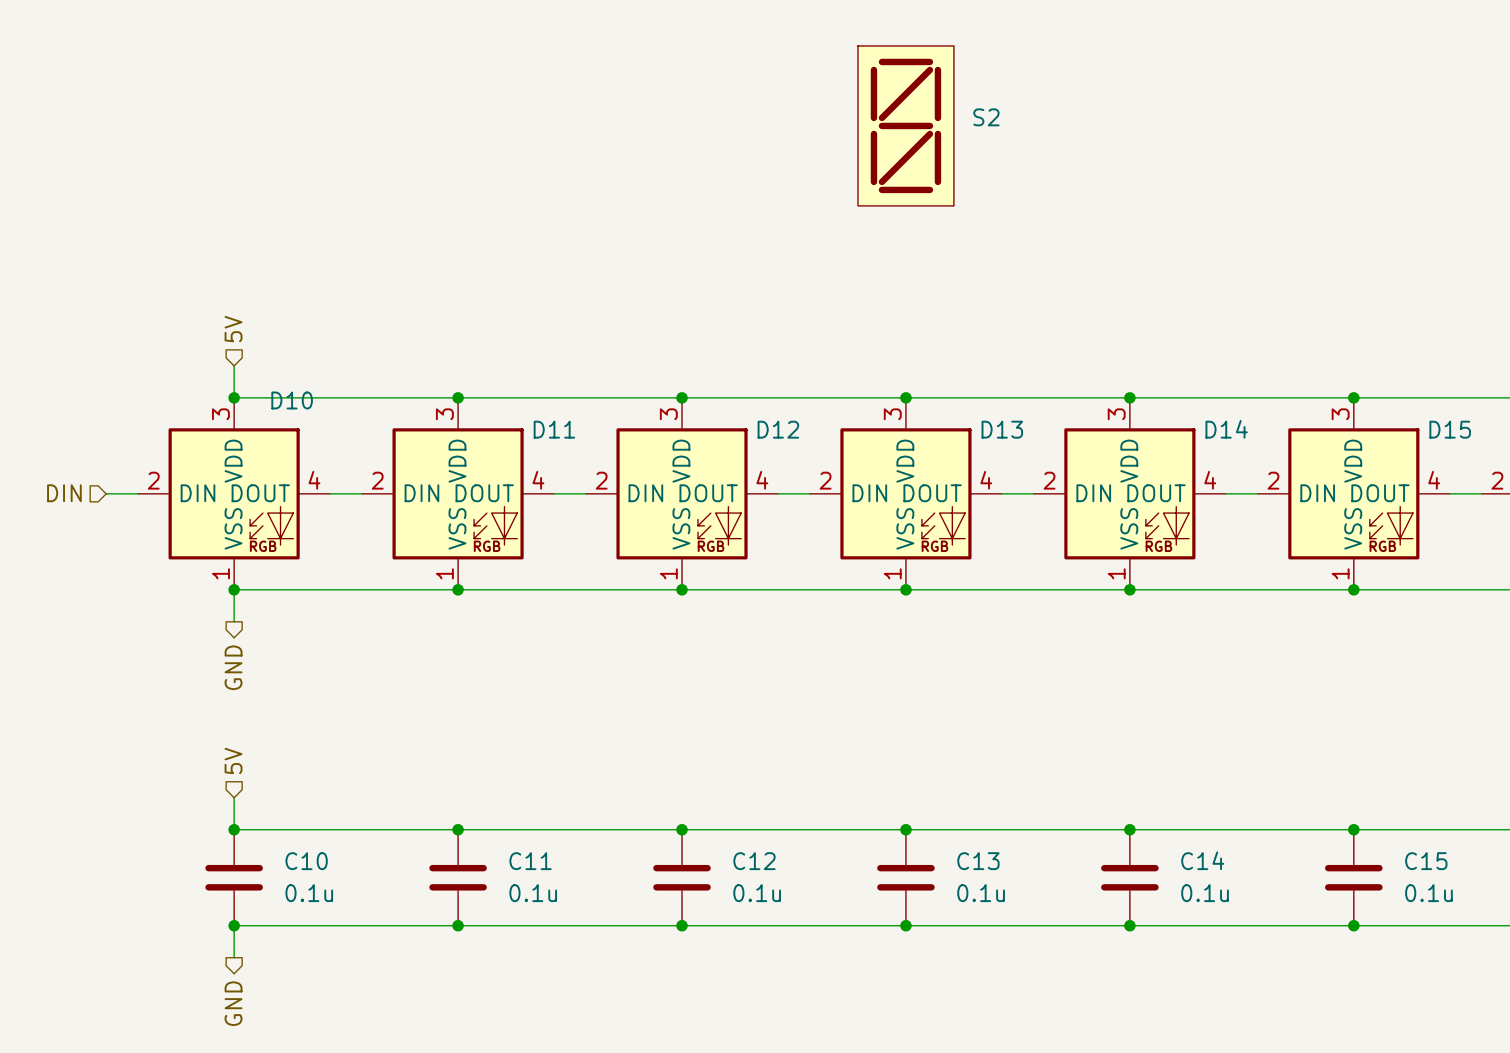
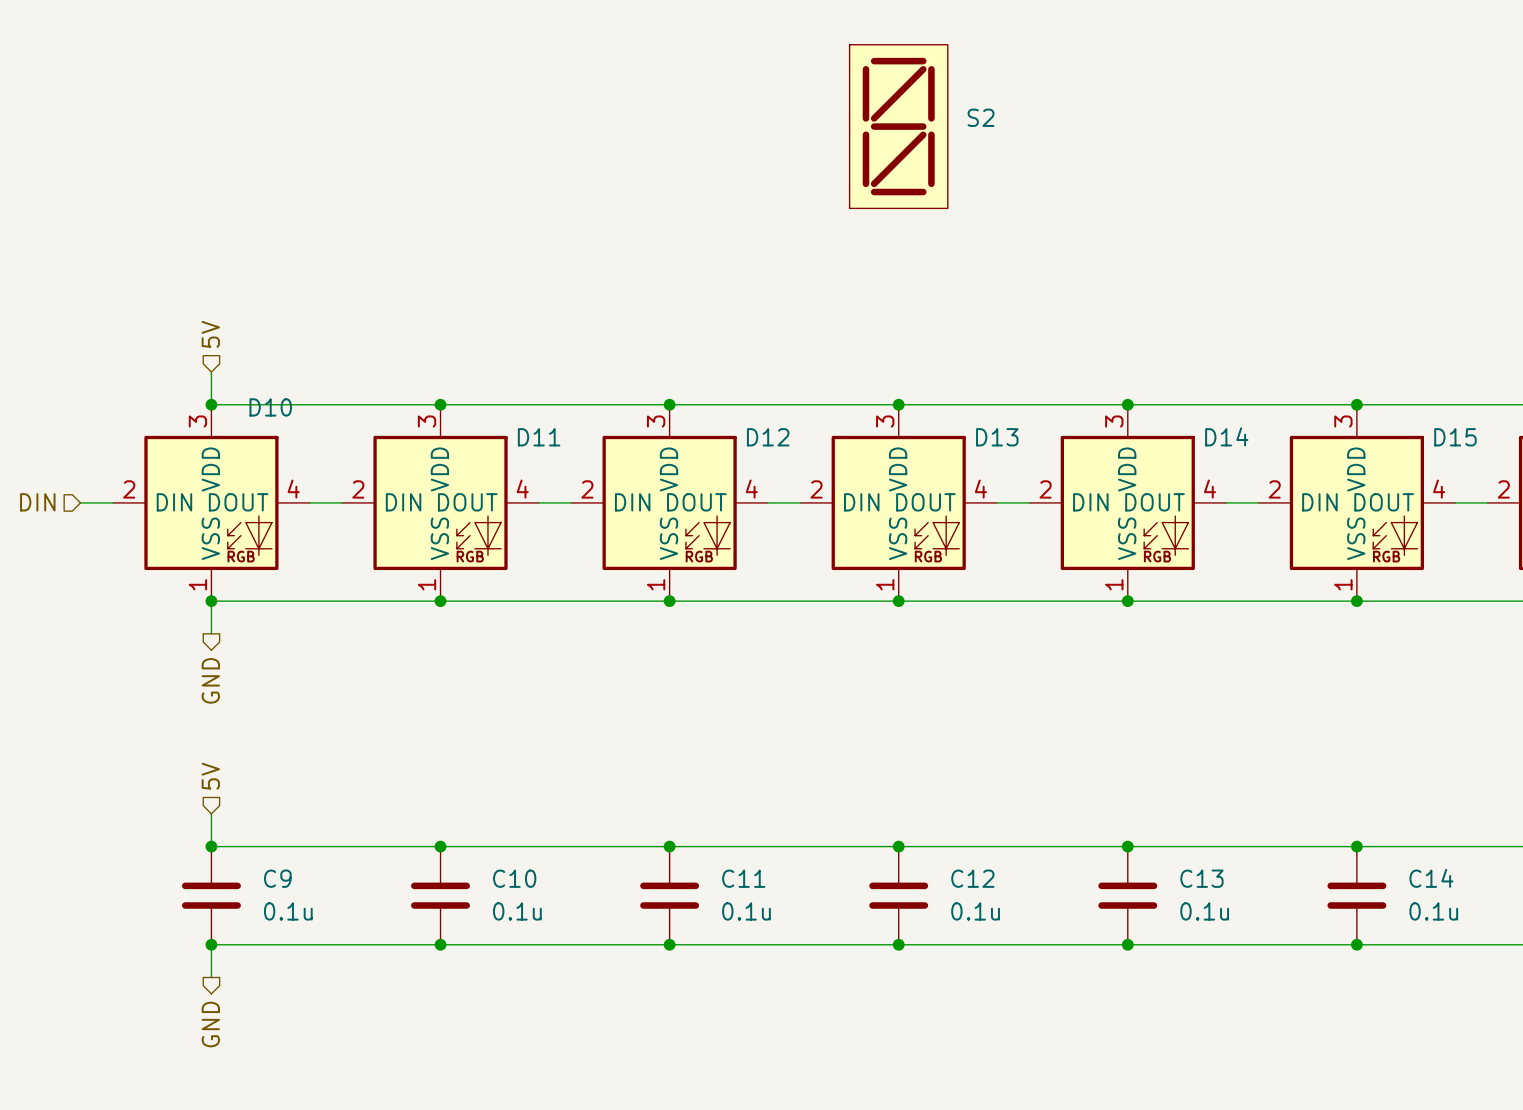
C14 name: C14 (1202, 860) -> C13 (1201, 878)
C10 name: C10 (306, 861) -> C9 (277, 878)
C11 name: C11 (530, 861) -> C10 (514, 878)
C12 name: C12 (754, 861) -> C11 (743, 878)
C13 name: C13 (978, 861) -> C12 (972, 878)
C15 name: C15 (1426, 861) -> C14 (1431, 878)

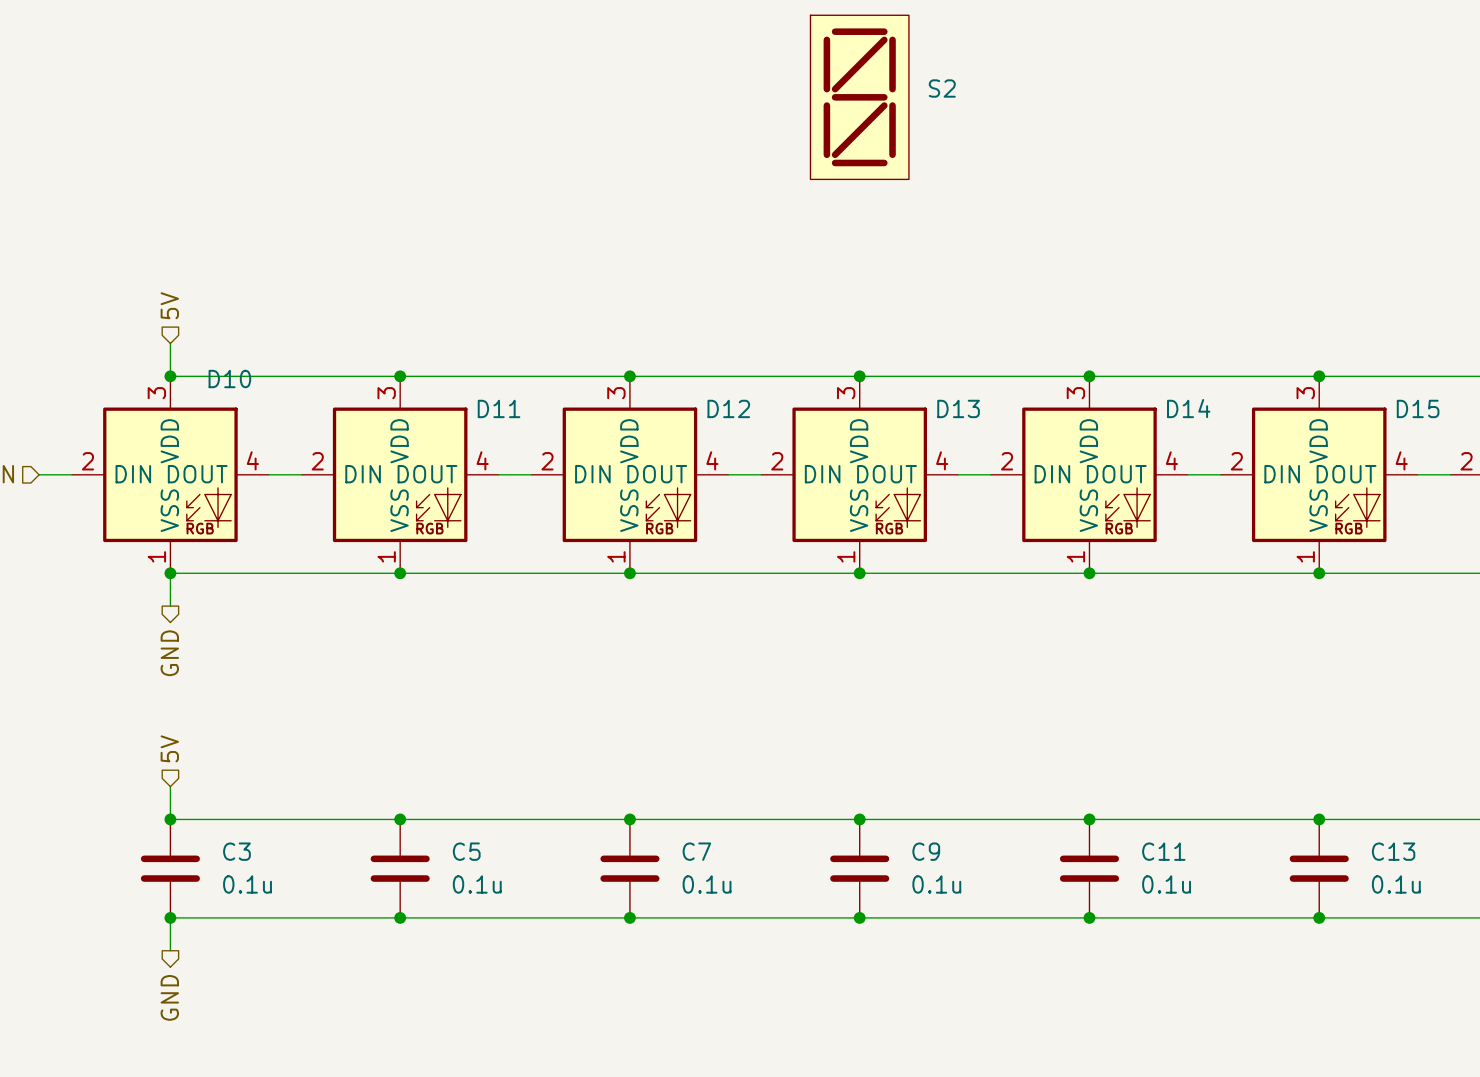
C9 name: C9 (277, 878) -> C3 (236, 851)
C10 name: C10 (514, 878) -> C5 (466, 851)
C11 name: C11 (743, 878) -> C7 (696, 851)
C12 name: C12 (972, 878) -> C9 (926, 851)
C13 name: C13 (1201, 878) -> C11 (1163, 851)
C14 name: C14 (1431, 878) -> C13 (1393, 851)

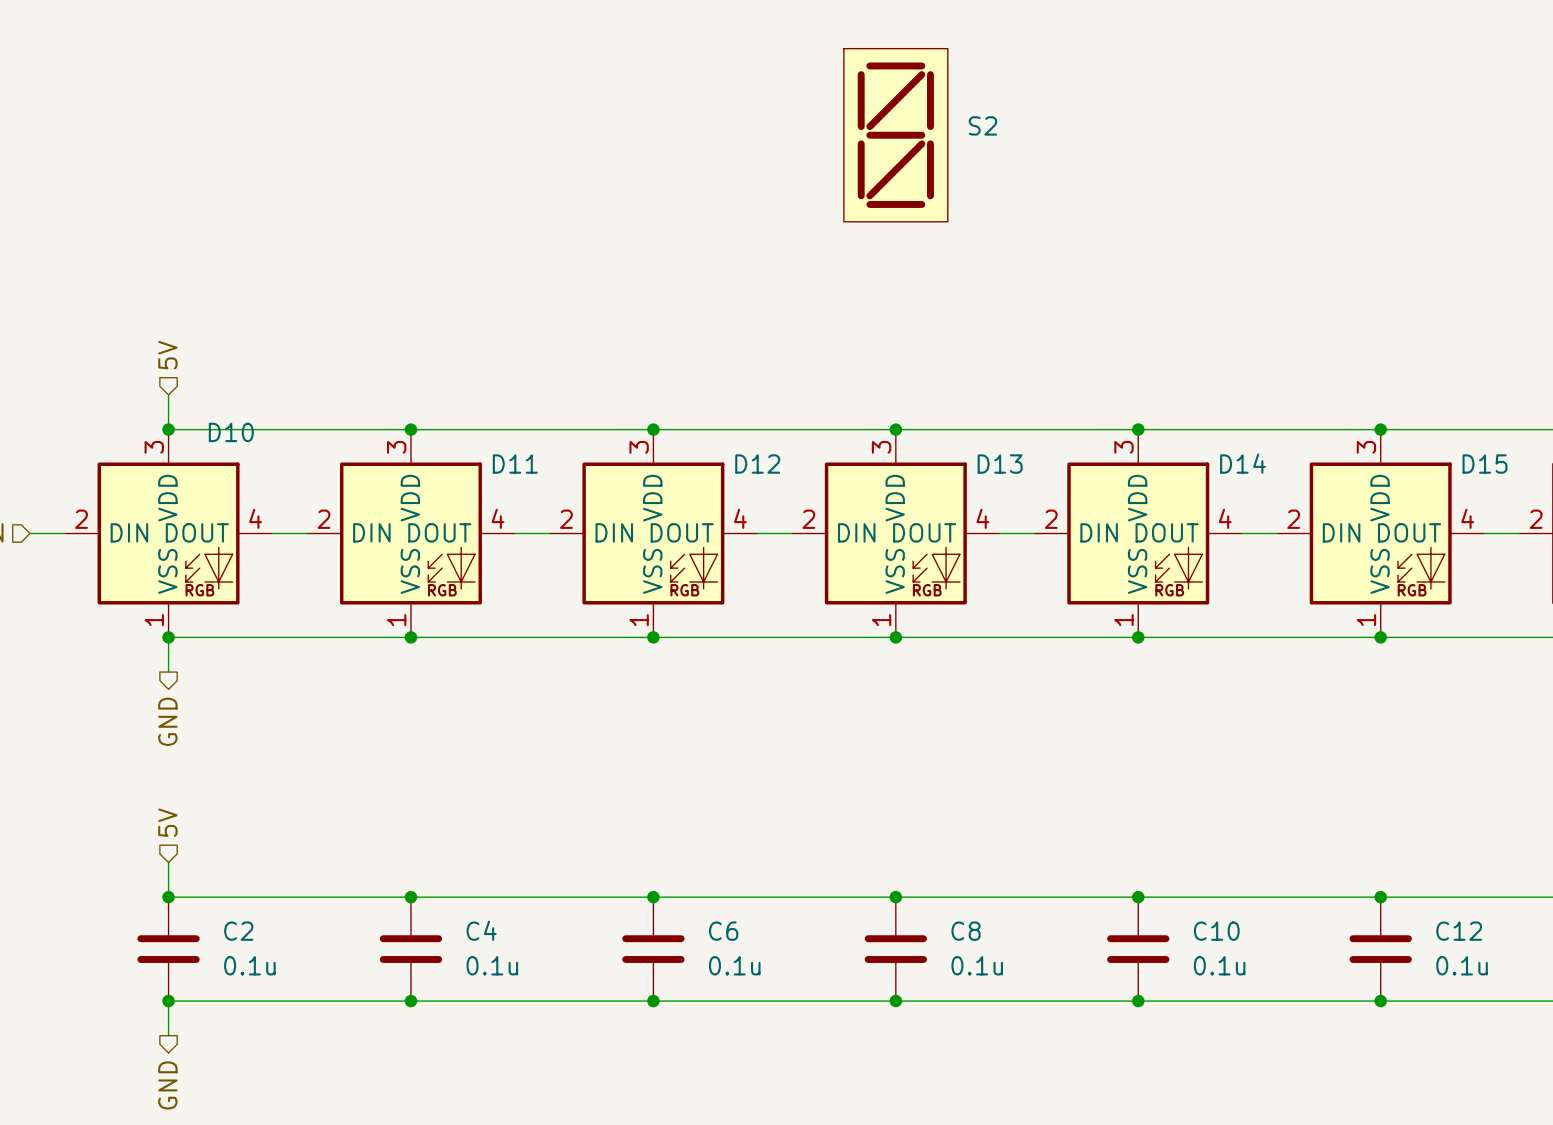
C3 name: C3 (236, 851) -> C2 (238, 931)
C5 name: C5 (466, 851) -> C4 (481, 930)
C7 name: C7 (696, 851) -> C6 (723, 931)
C9 name: C9 (926, 851) -> C8 (966, 931)
C11 name: C11 (1163, 851) -> C10 (1216, 931)
C13 name: C13 (1393, 851) -> C12 (1459, 931)

